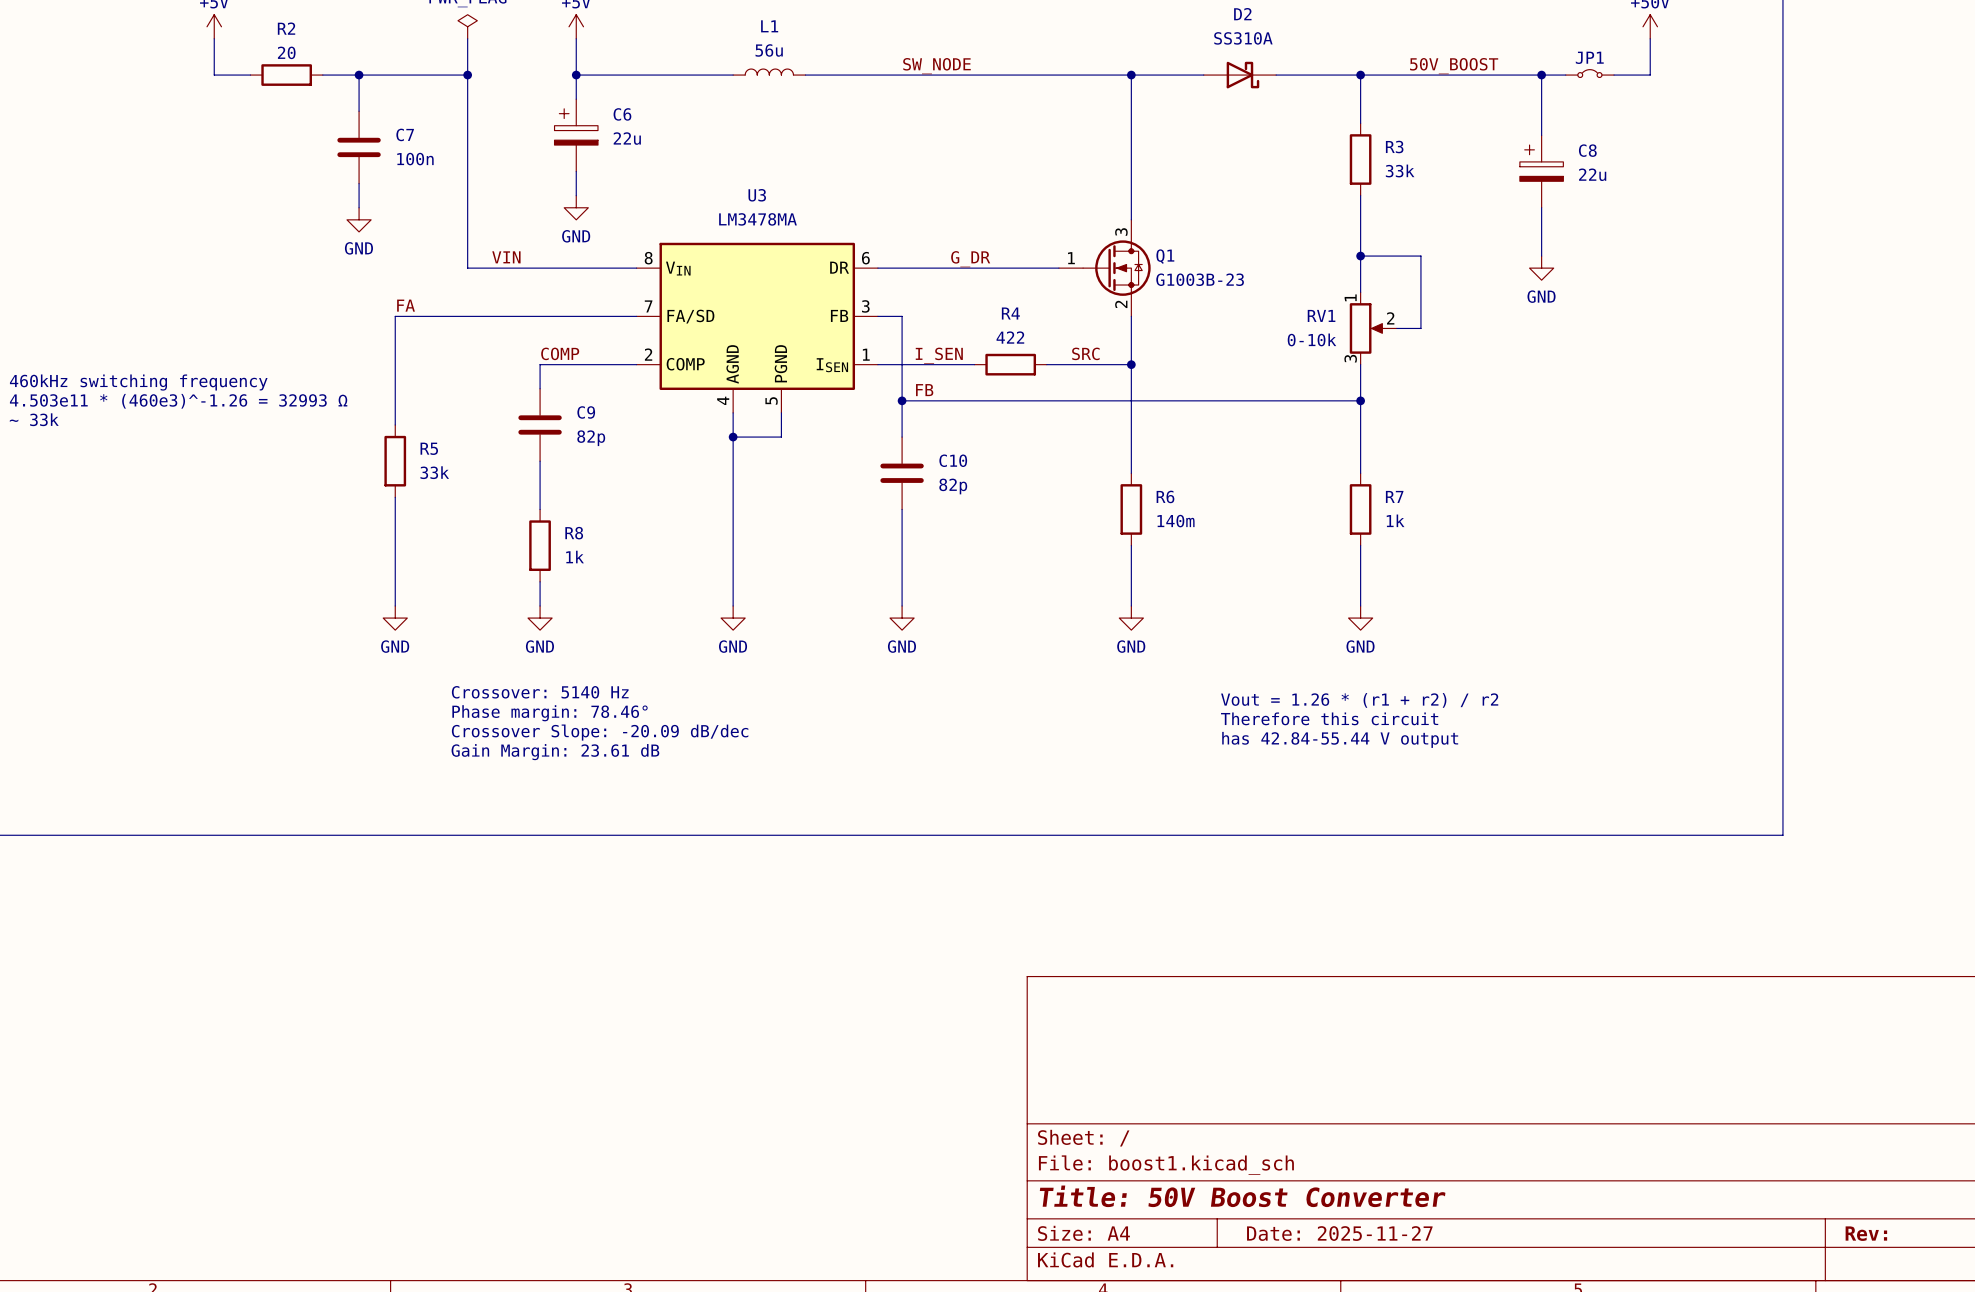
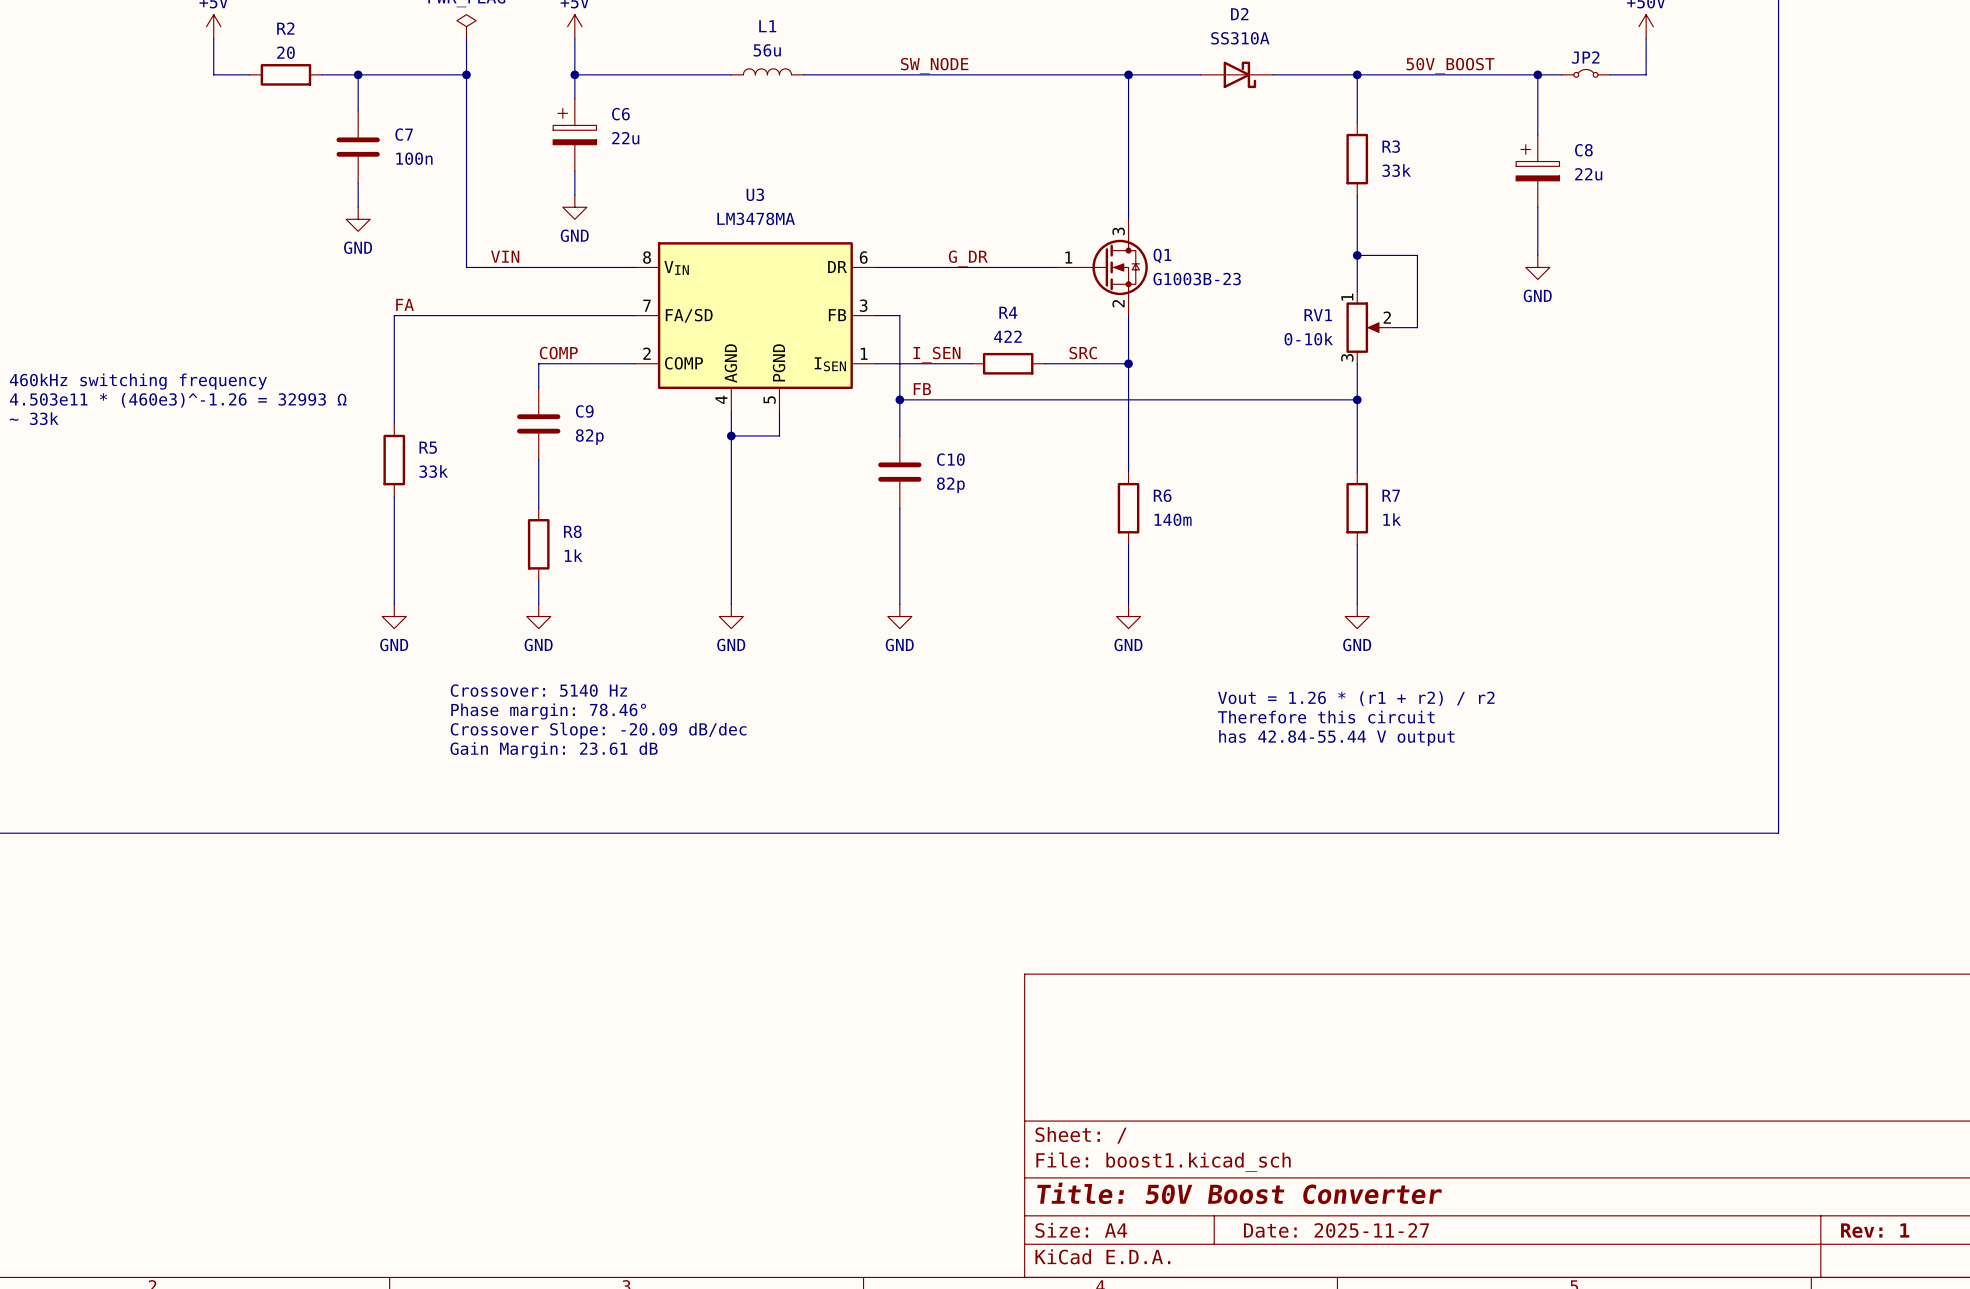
JP1 name: JP1 (1589, 57) -> JP2 (1585, 57)
title block: Rev: (1866, 1233) -> Rev: 1 (1875, 1230)

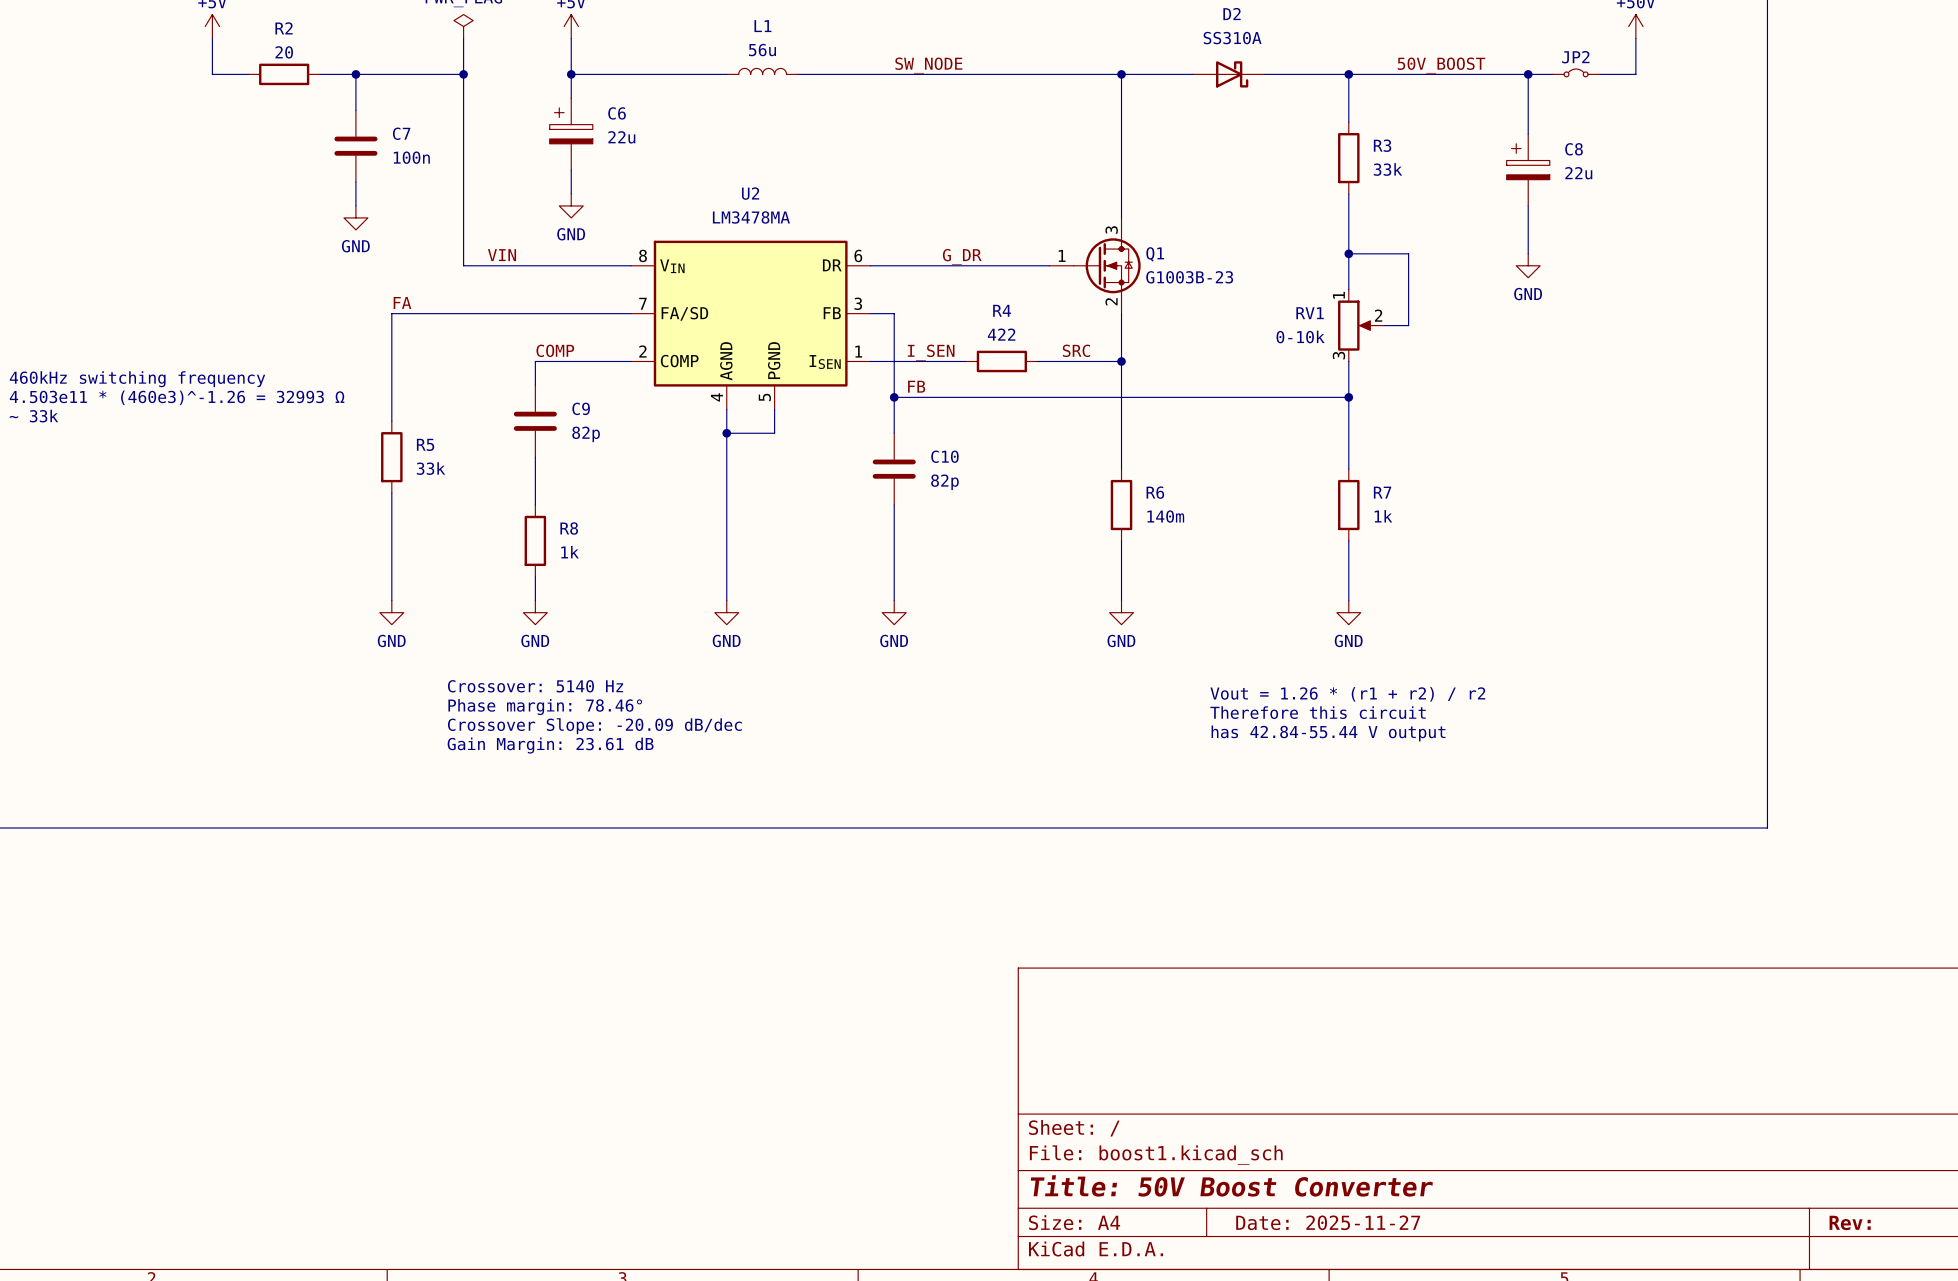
U3 name: U3 (755, 194) -> U2 (750, 193)
title block: Rev: 1 (1875, 1230) -> Rev: (1850, 1222)

